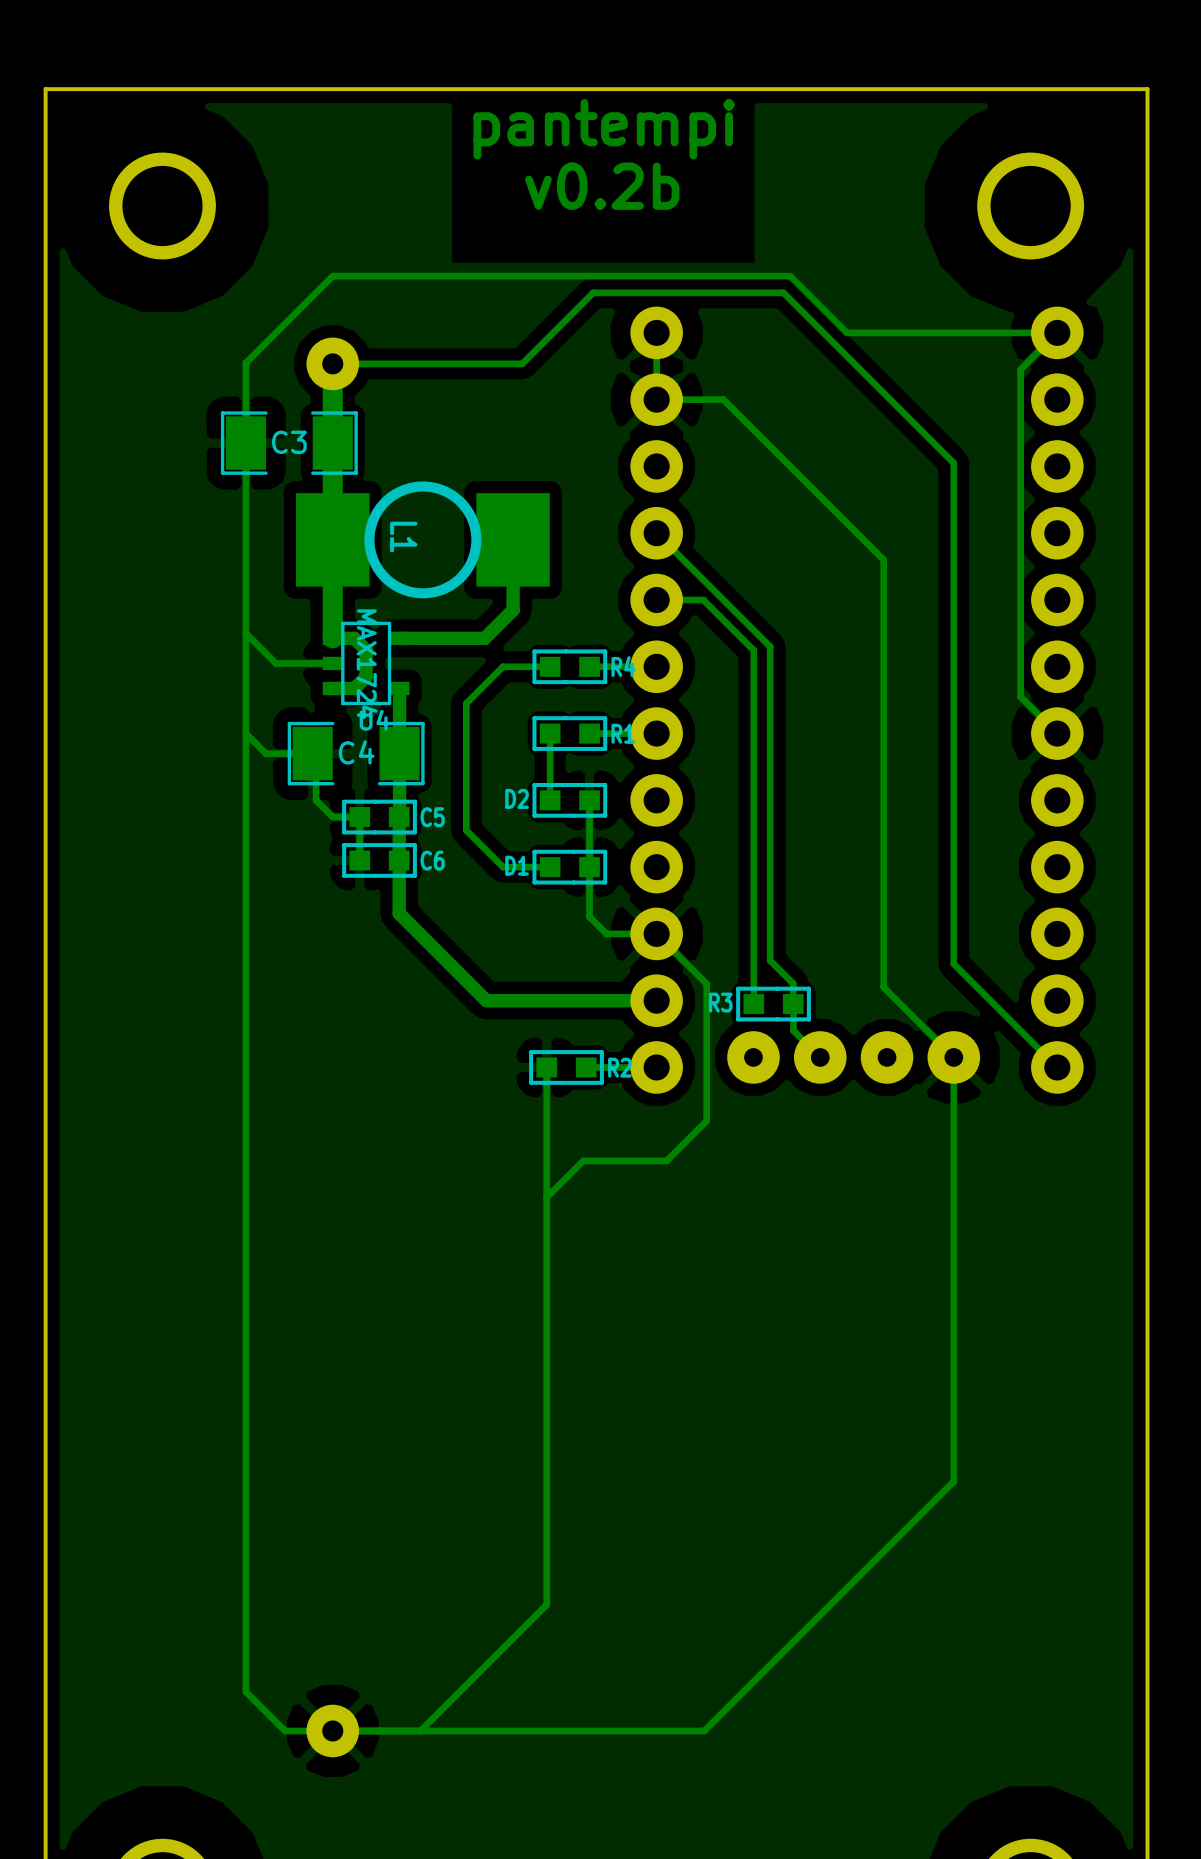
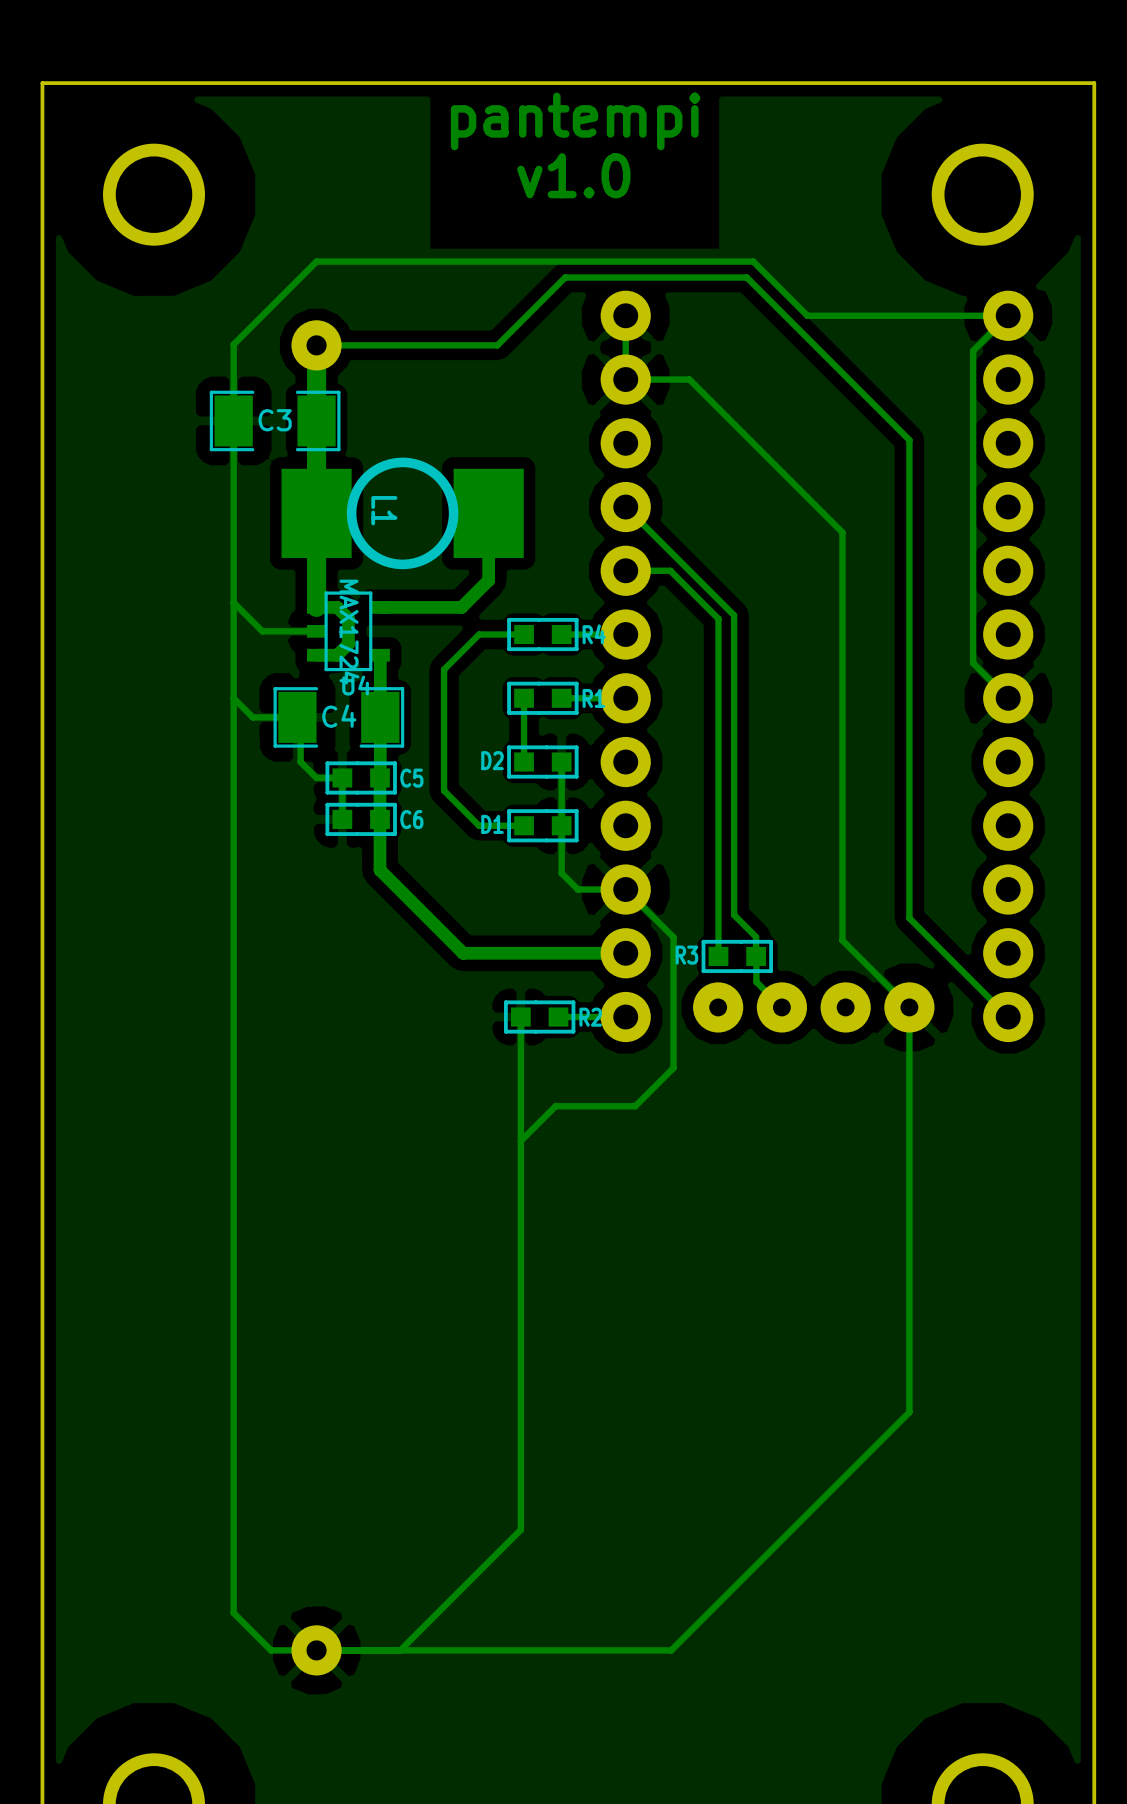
text: v0.2b (602, 186) -> v1.0 (573, 175)

